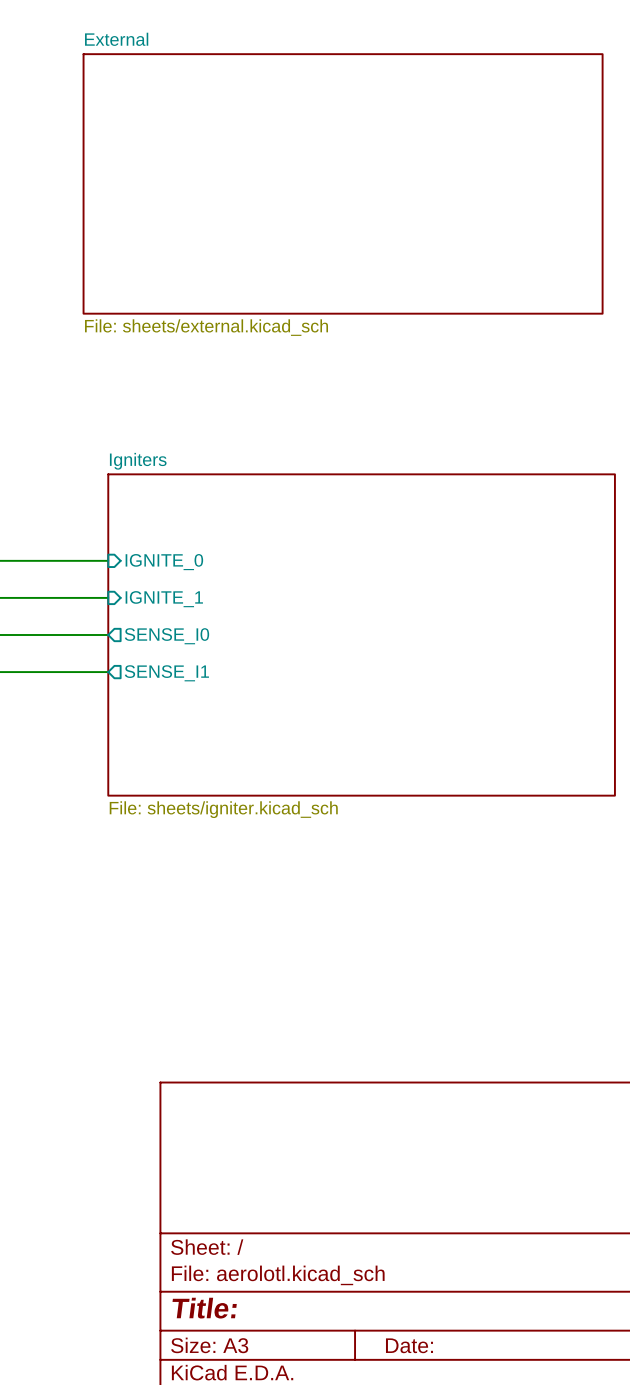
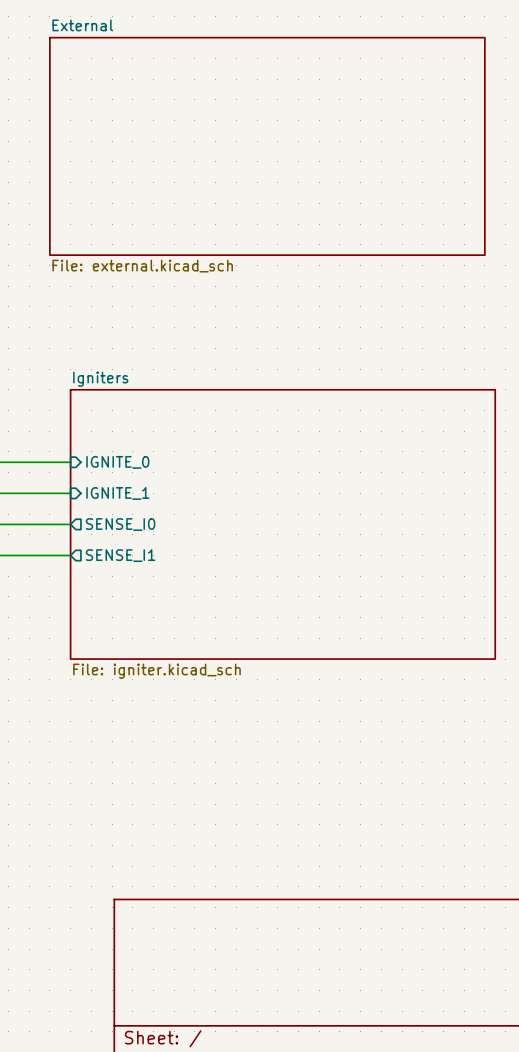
sheet External value: File: sheets/external.kicad_sch (206, 327) -> File: external.kicad_sch (142, 266)
sheet Igniters value: File: sheets/igniter.kicad_sch (223, 809) -> File: igniter.kicad_sch (156, 671)

